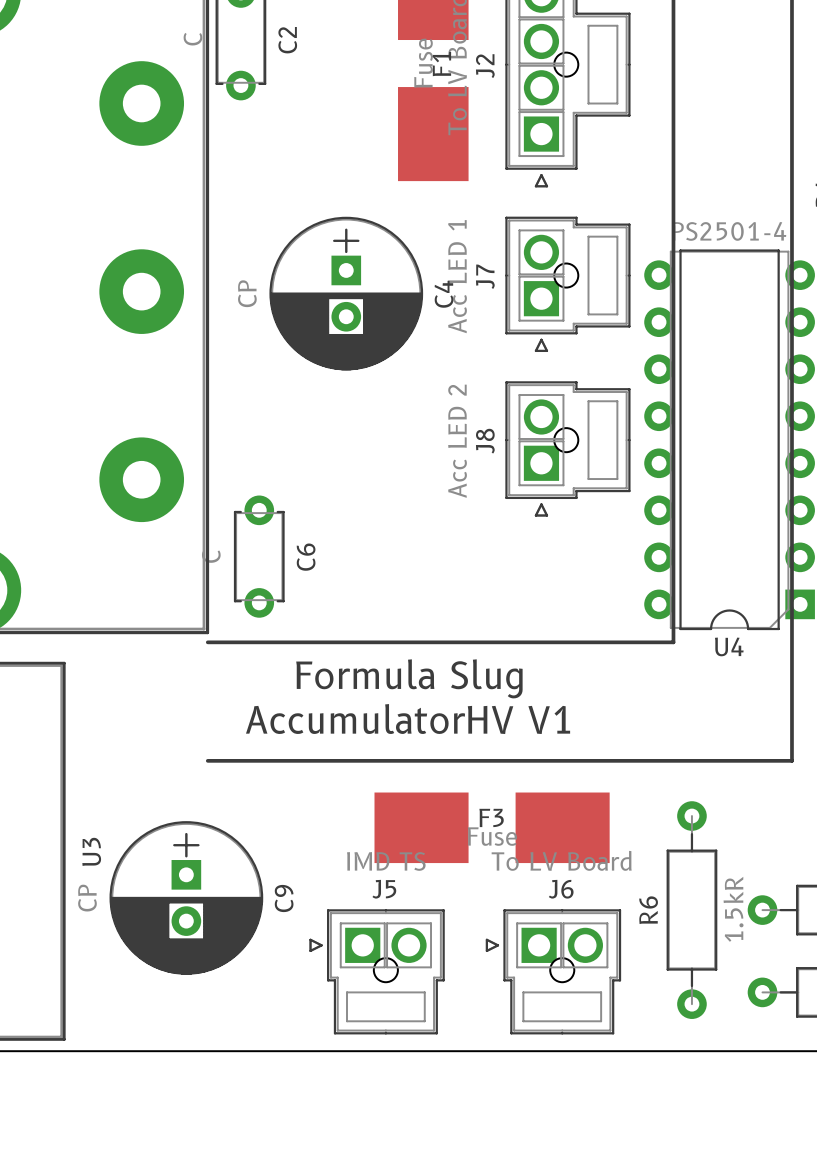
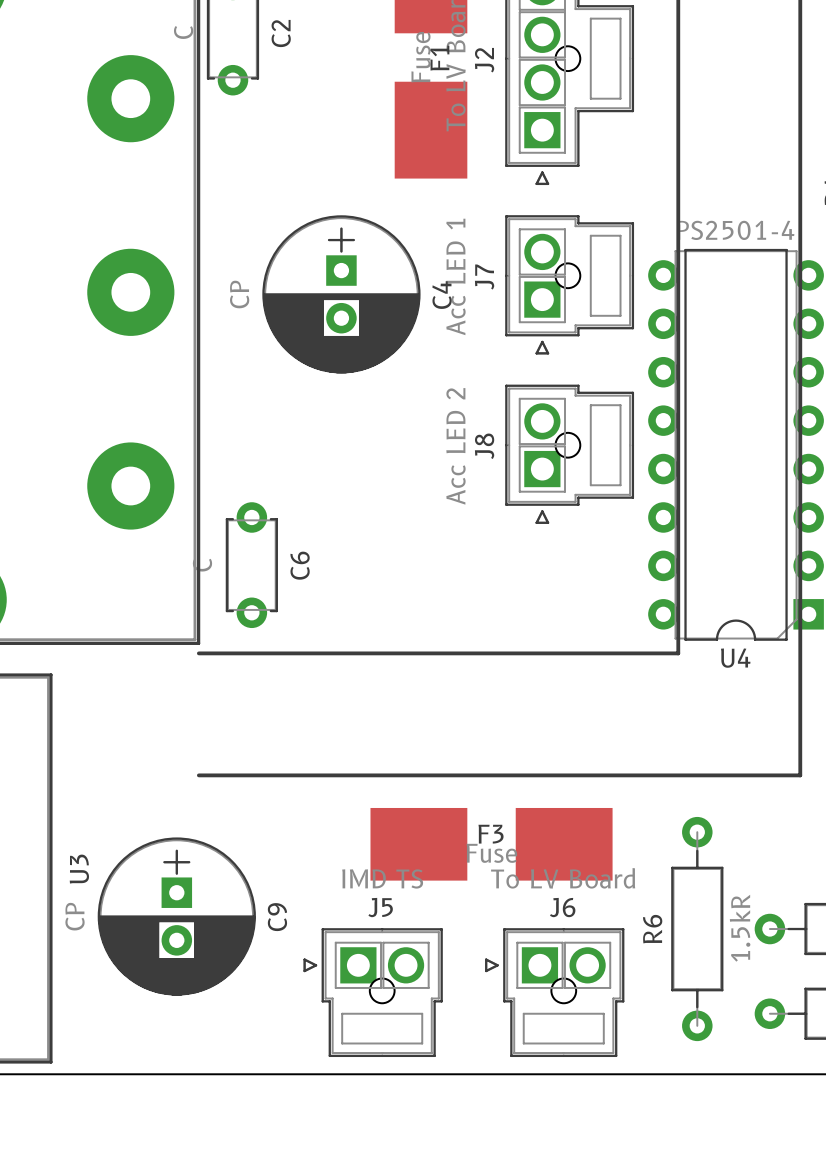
text: Formula Slug (409, 678) -> none
text: AccumulatorHV V1 (408, 719) -> none

